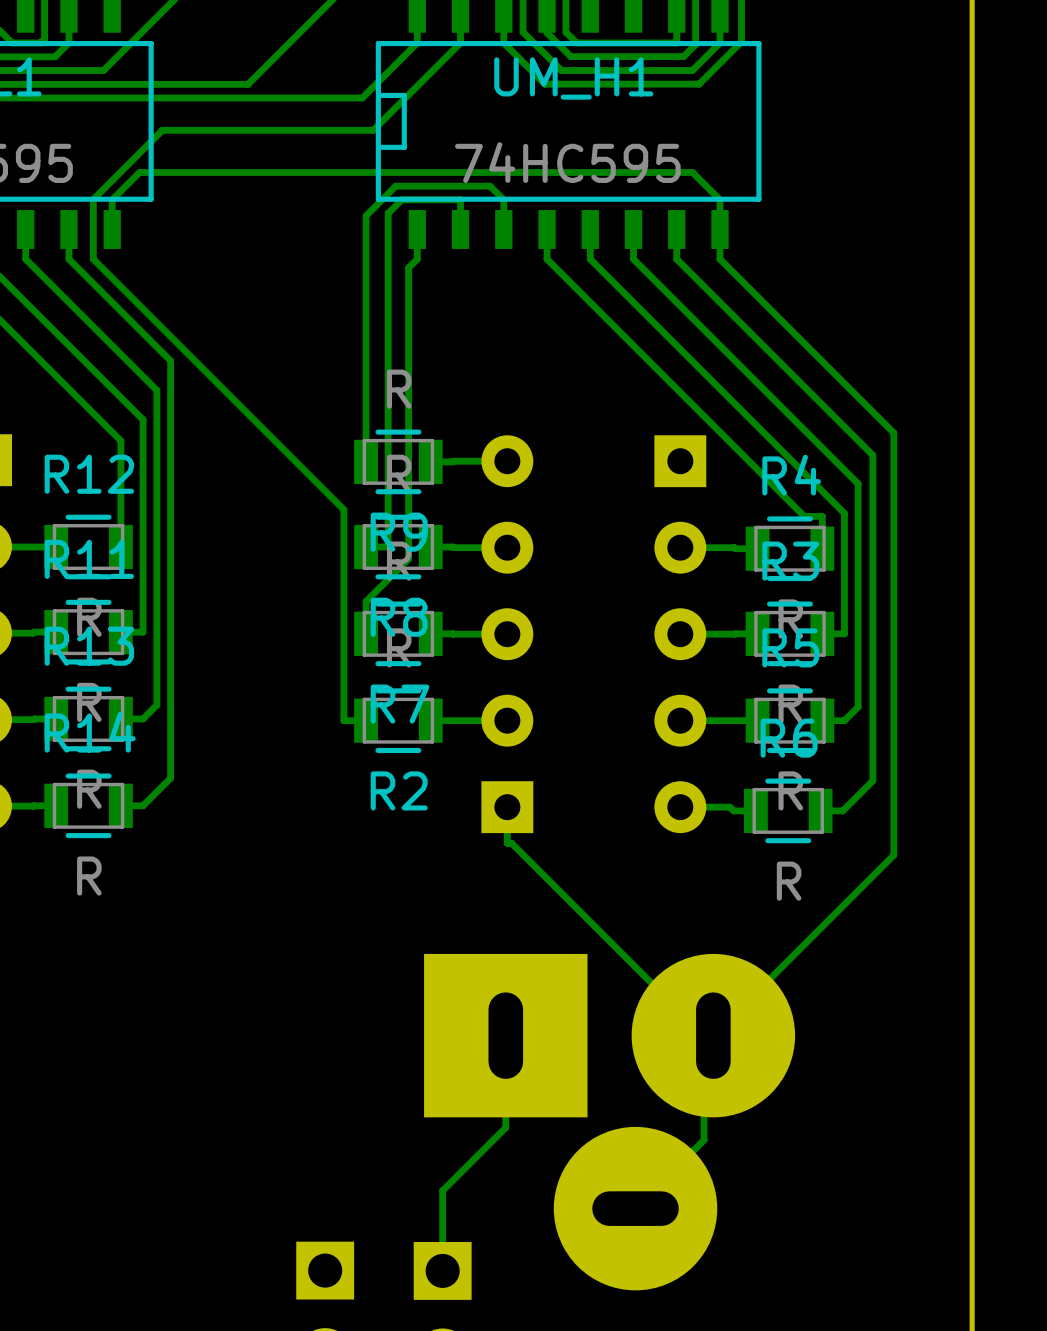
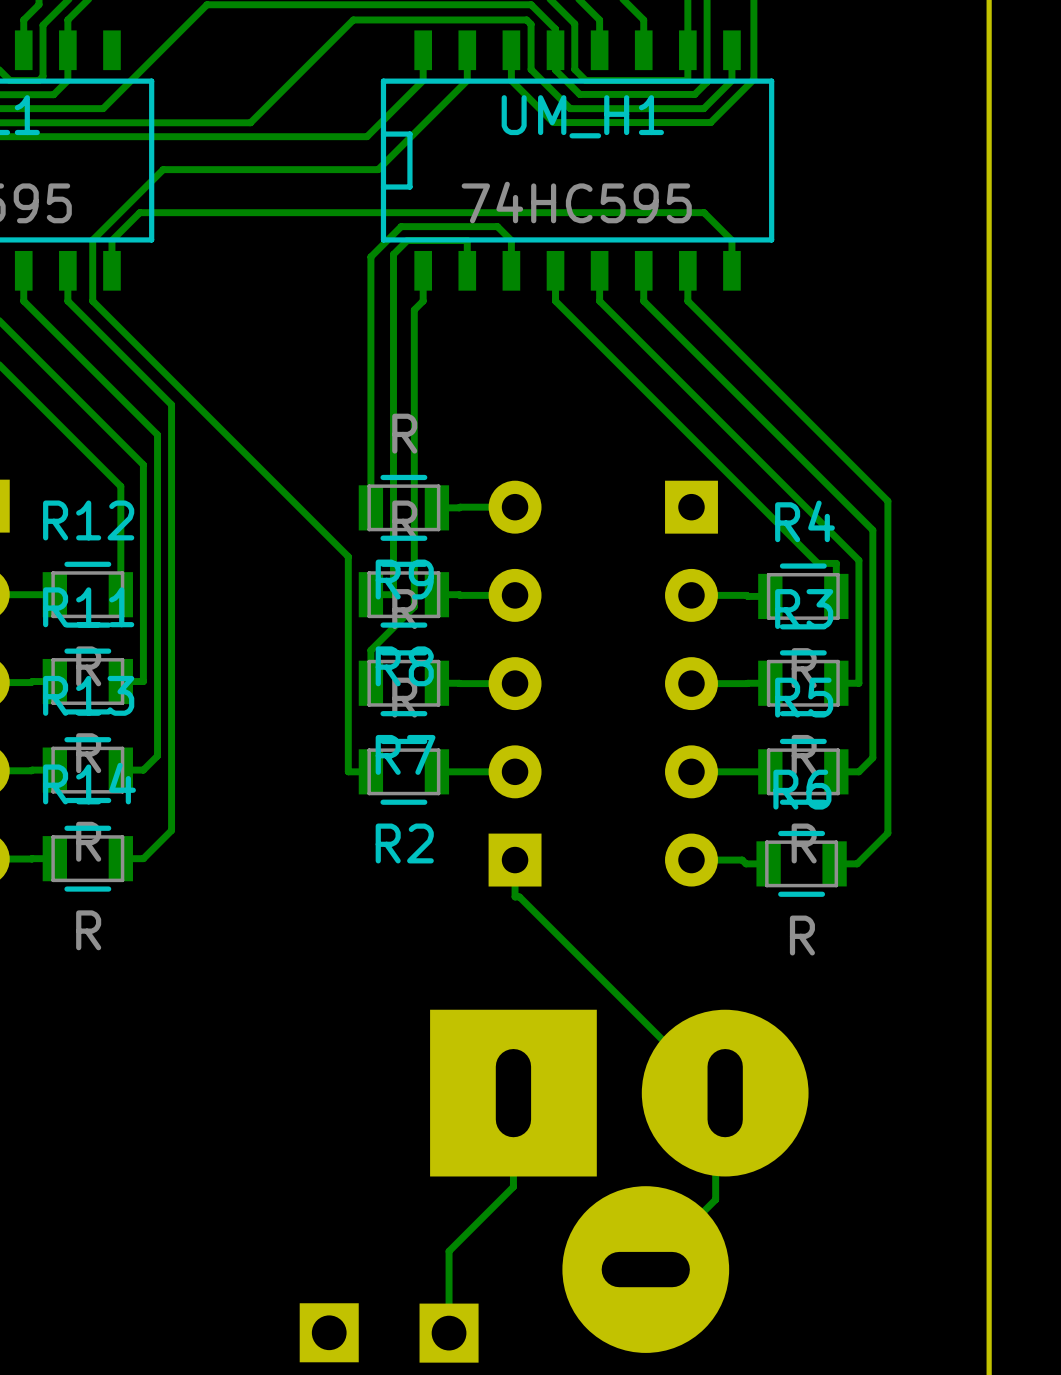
track: (720, 229) (720, 259) (893, 432) (893, 855) (713, 1035) -> none

